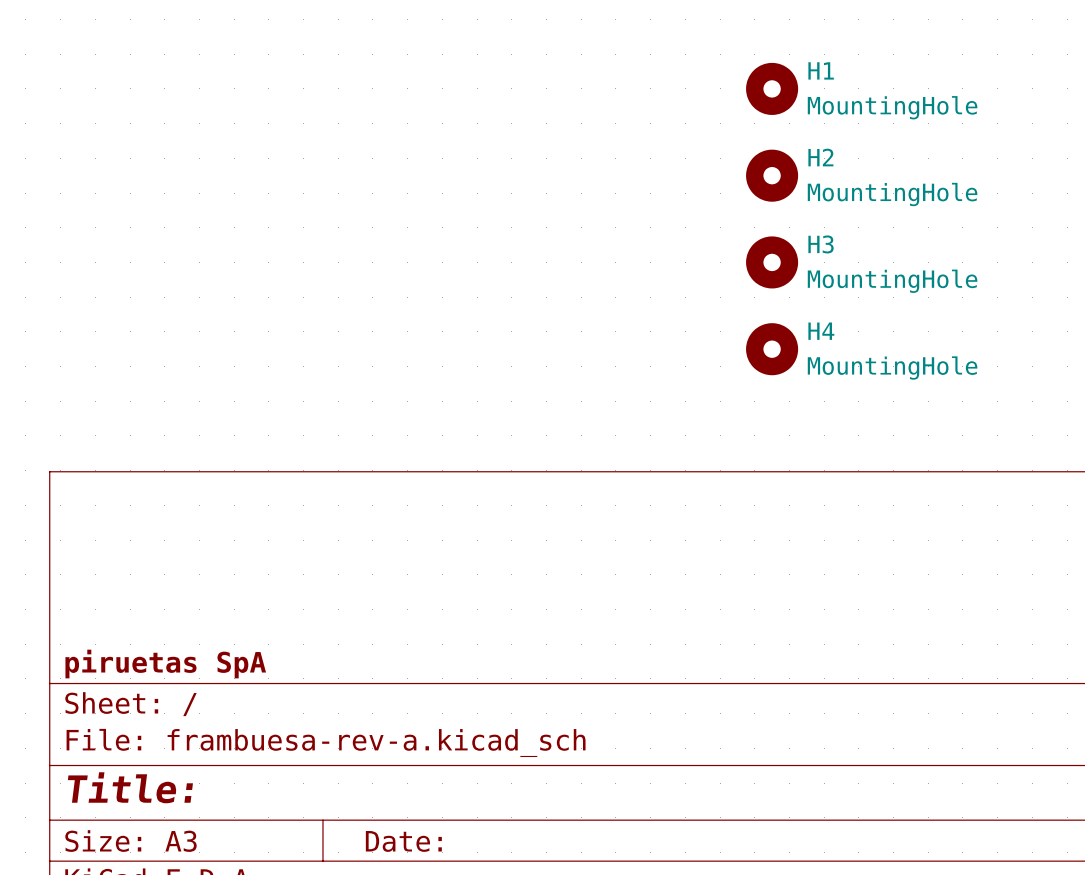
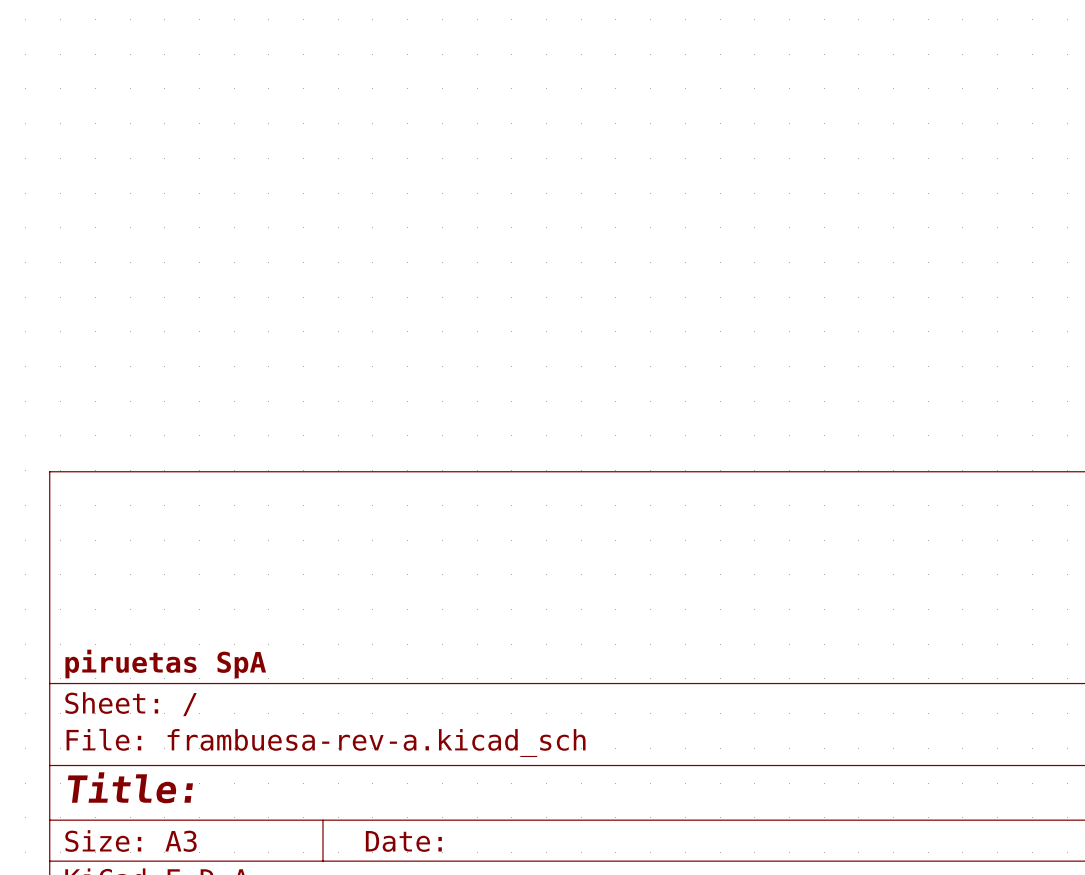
H1: MountingHole (772, 88) -> none
H2: MountingHole (772, 175) -> none
H3: MountingHole (772, 262) -> none
H4: MountingHole (772, 349) -> none

